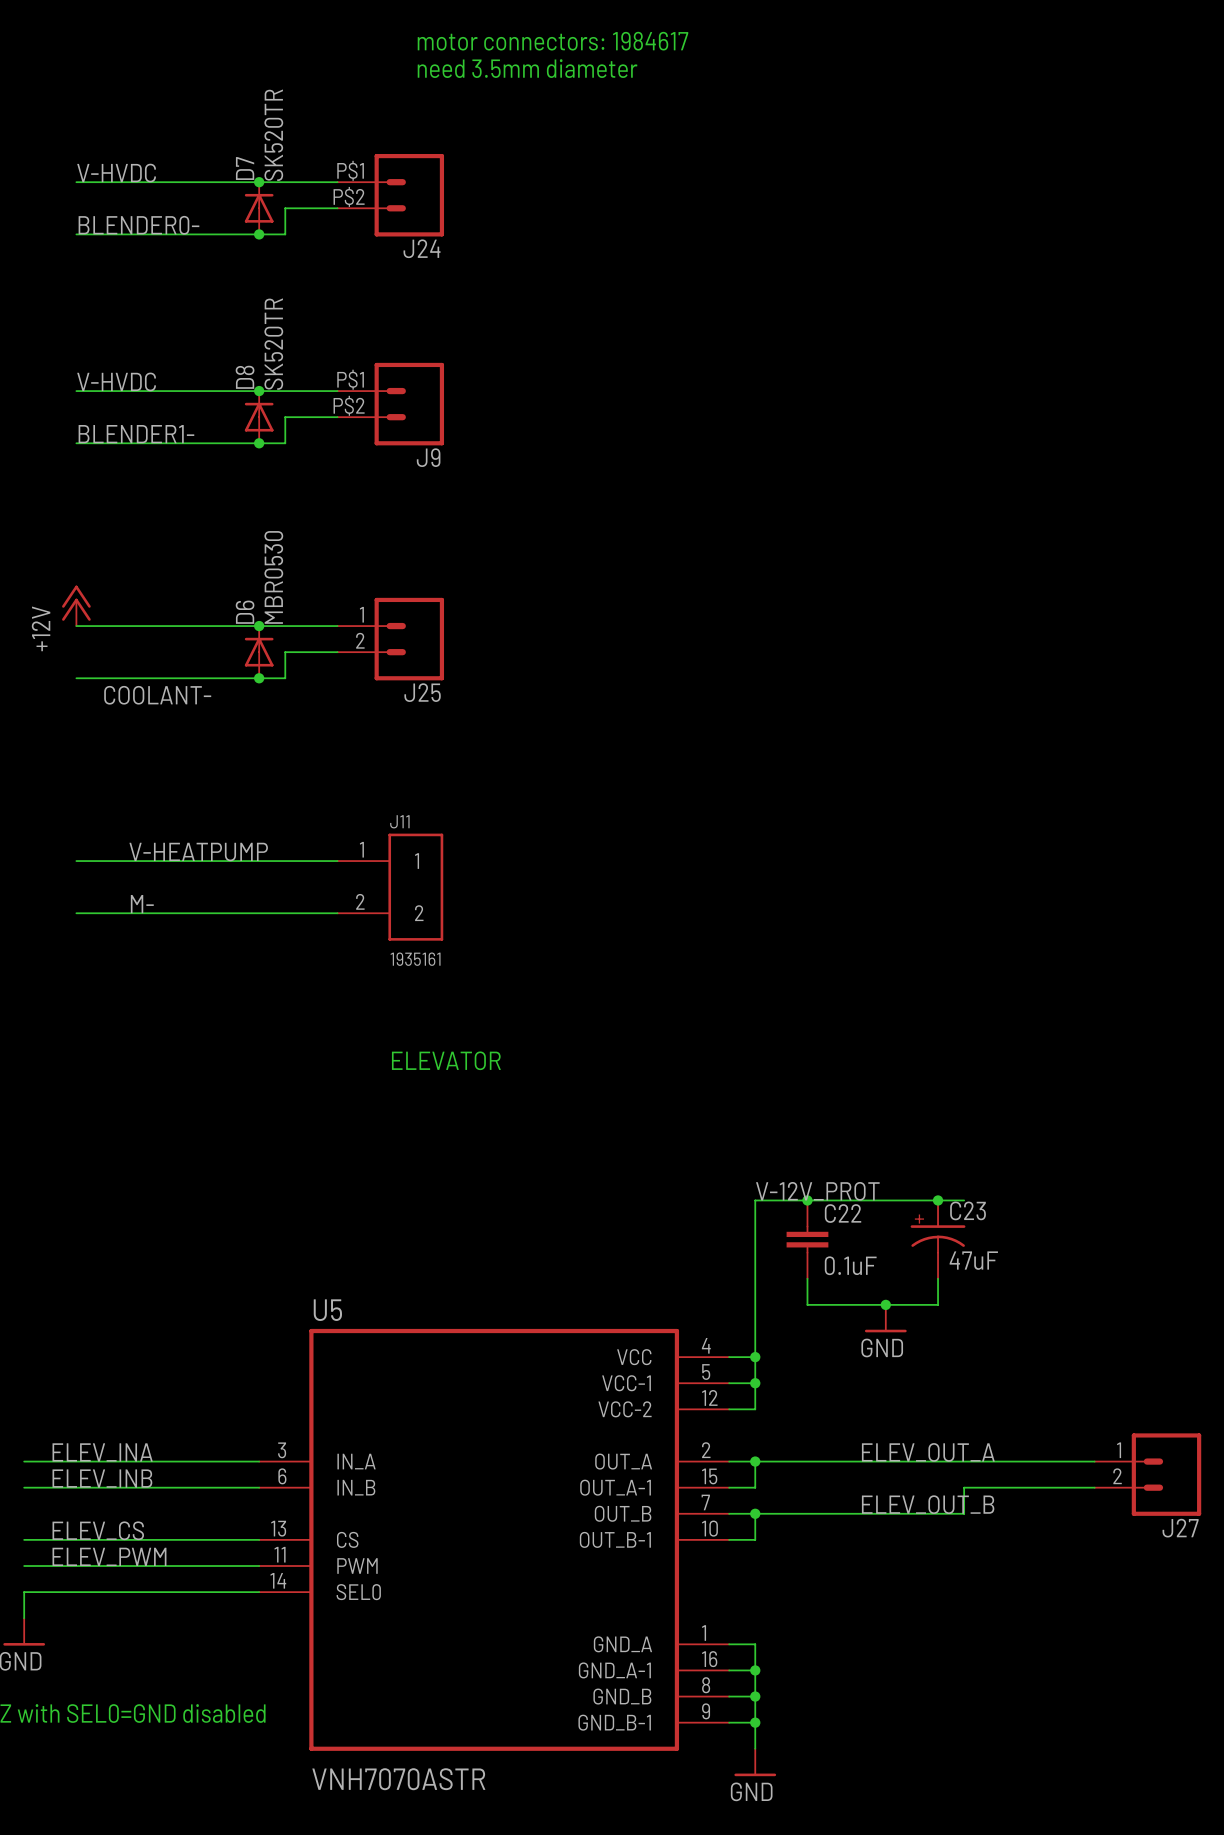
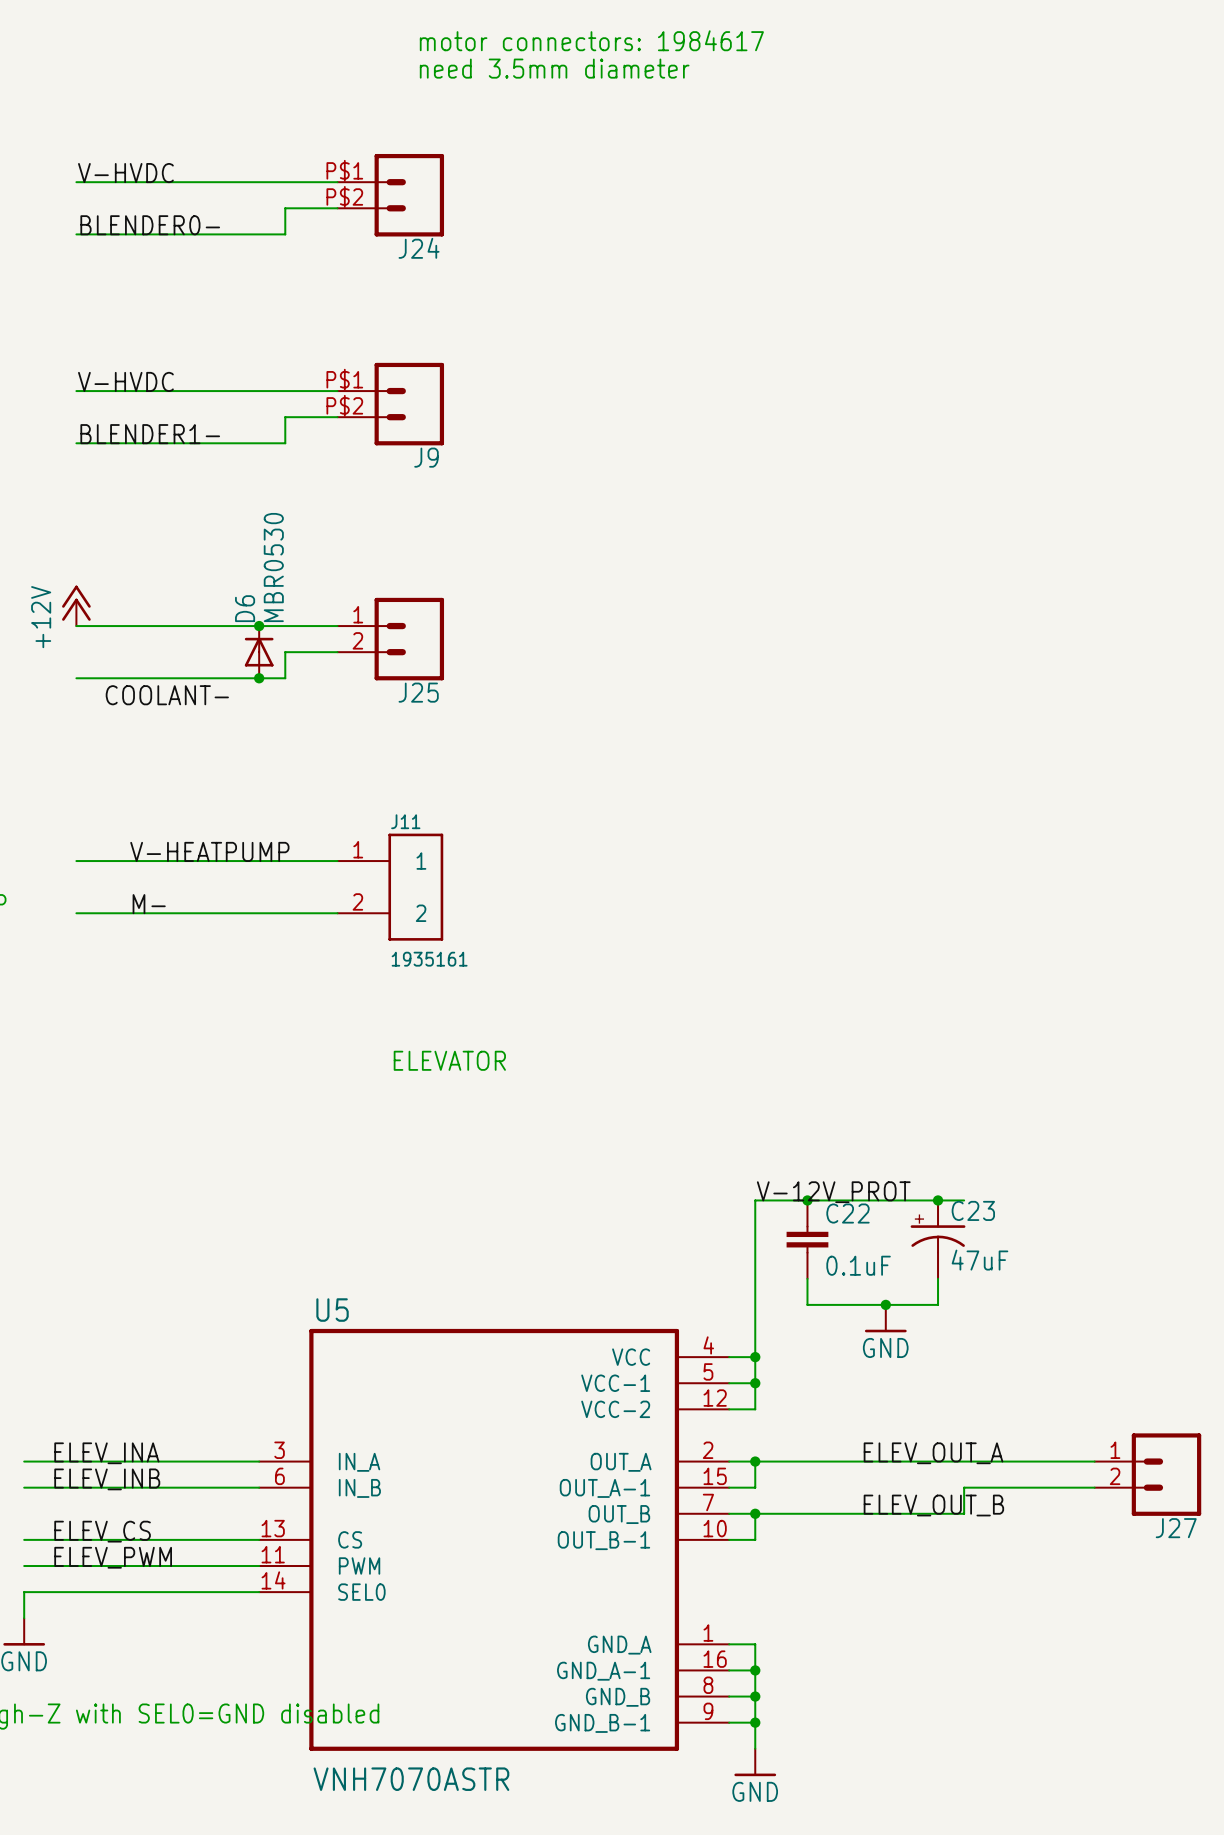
junction: (259, 182) -> none
D7: SK520TR (259, 208) -> none
junction: (259, 234) -> none
junction: (259, 391) -> none
D8: SK520TR (259, 417) -> none
junction: (259, 443) -> none

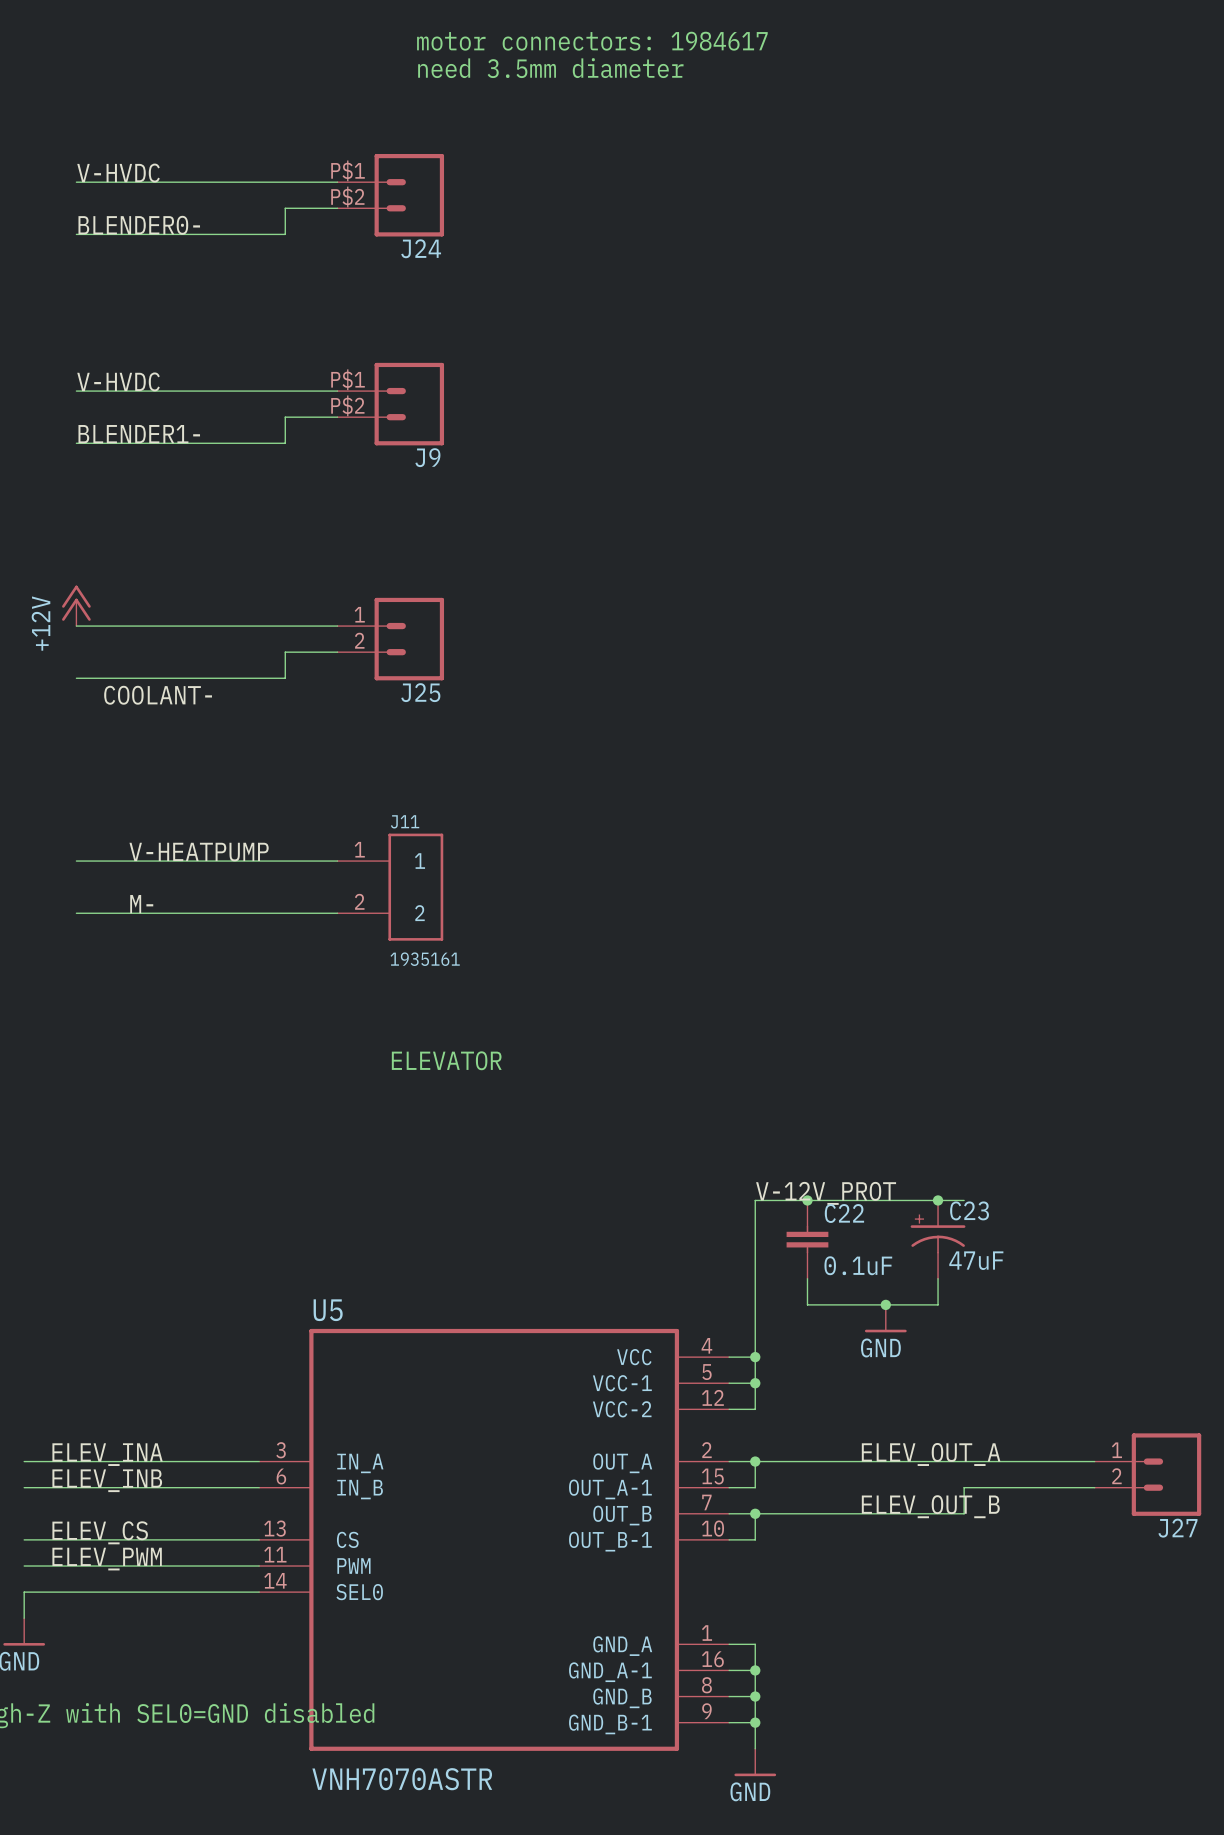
junction: (259, 626) -> none
D6: MBR0530 (259, 652) -> none
junction: (259, 678) -> none

